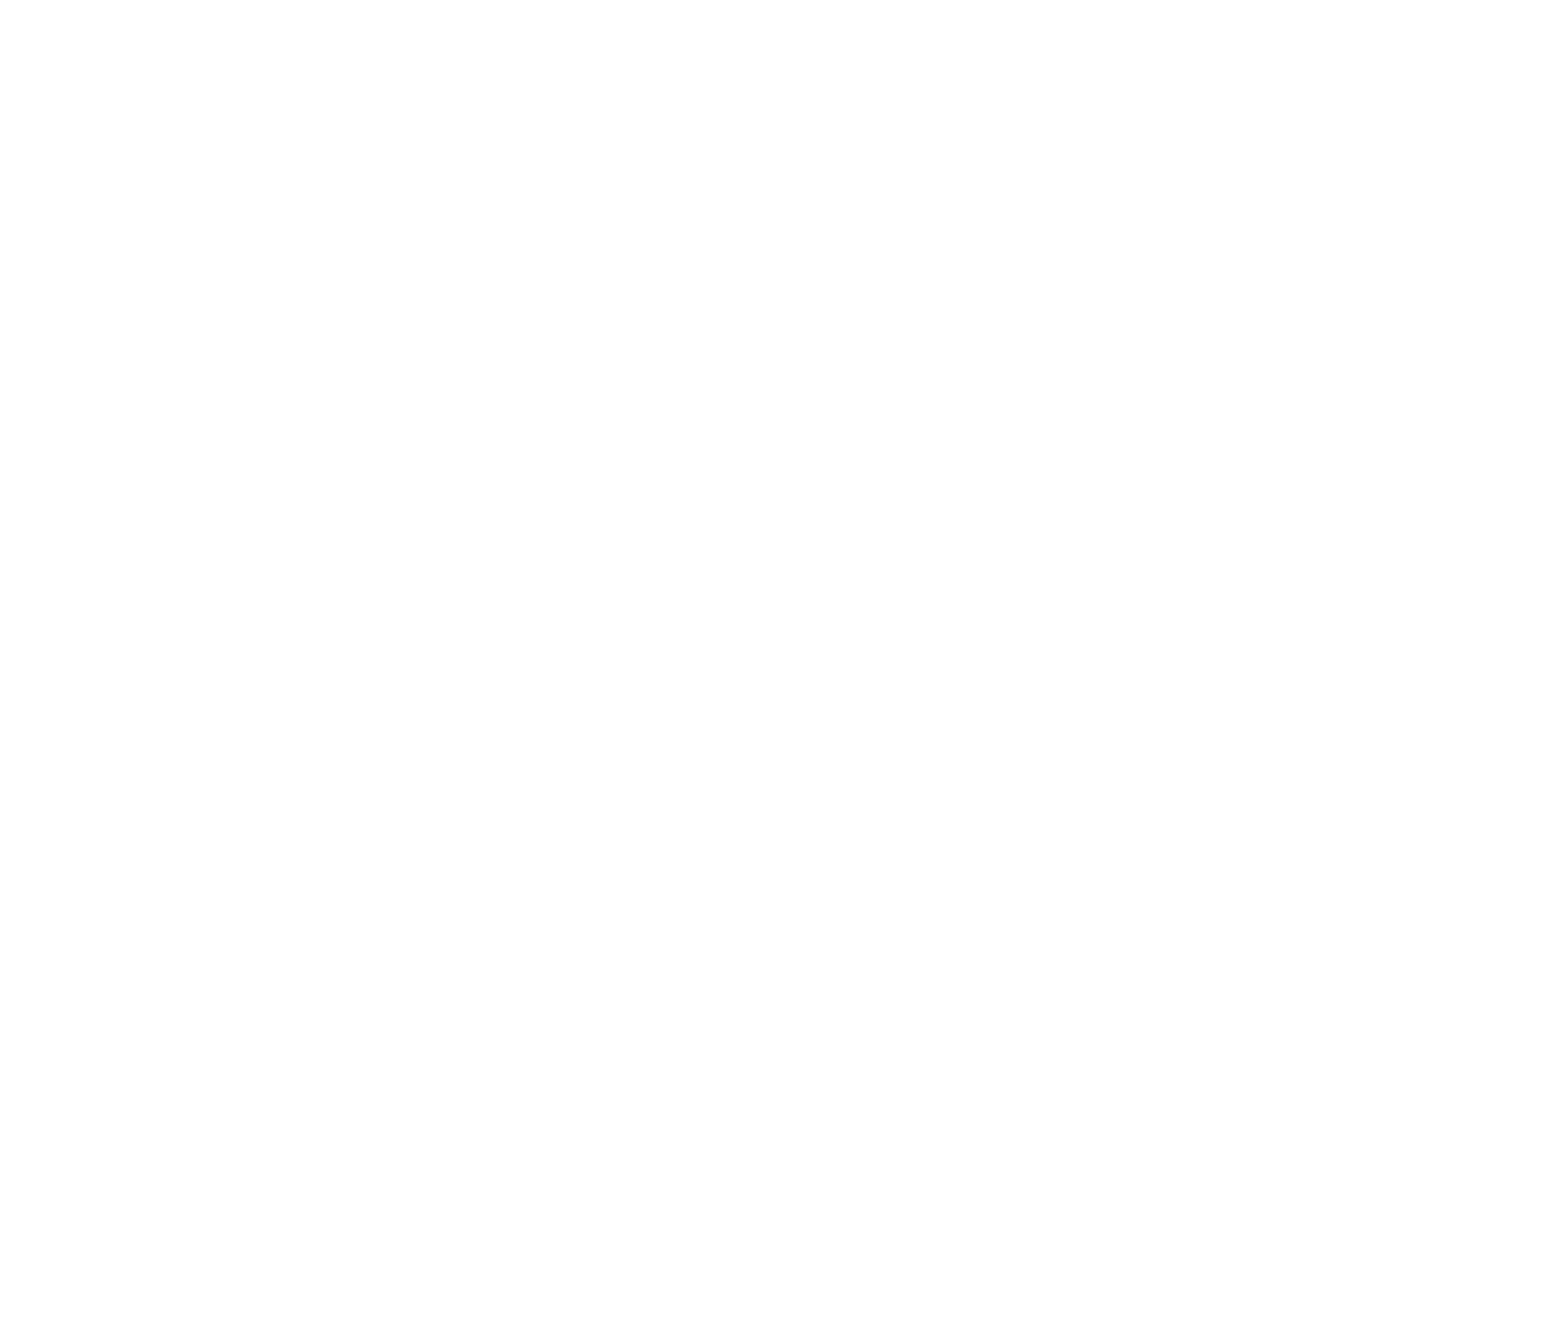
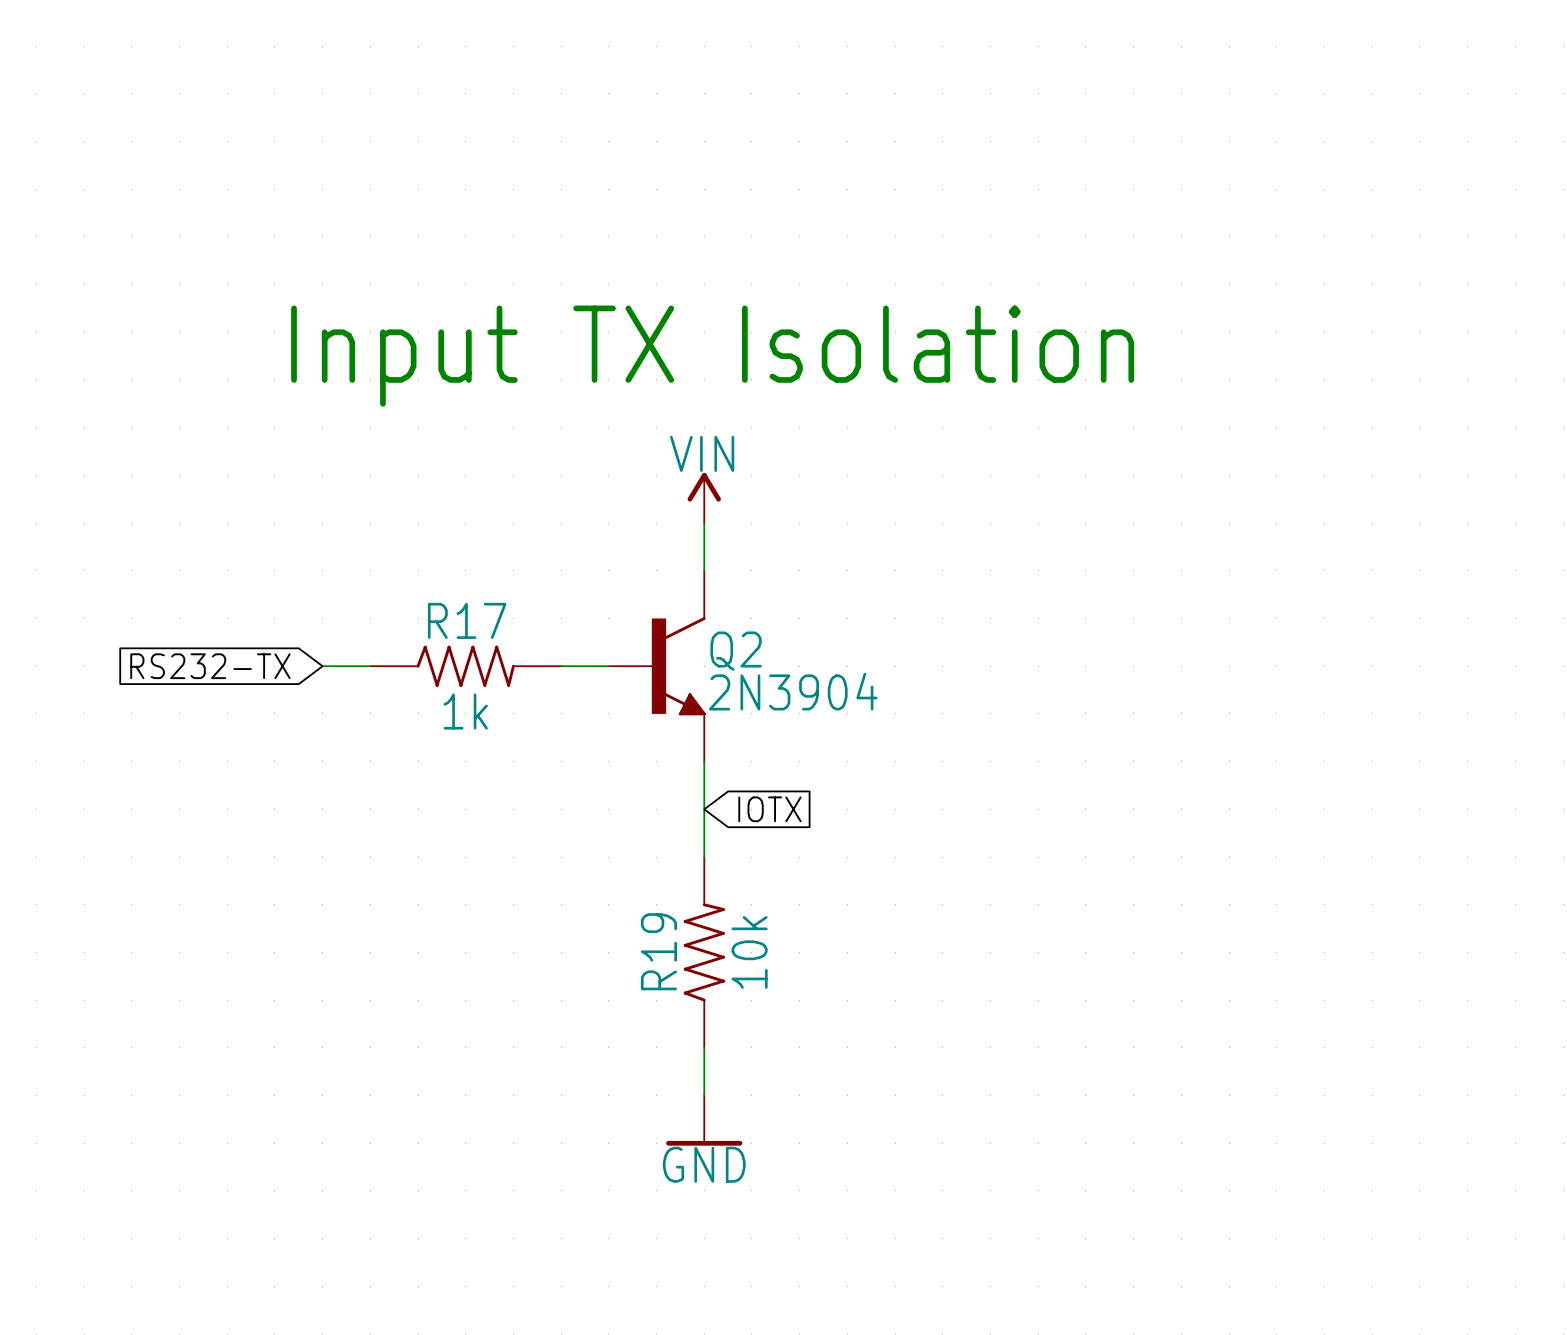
text: none -> Input TX Isolation (712, 356)
power symbol: none -> VIN (704, 498)
wire: none -> (704, 523) (704, 570)
global label: none -> RS232-TX (210, 666)
wire: none -> (322, 666) (370, 666)
R17: none -> 1k (465, 666)
wire: none -> (561, 666) (608, 666)
Q2: none -> 2N3904 (657, 666)
wire: none -> (704, 761) (704, 857)
global label: none -> IOTX (769, 809)
R19: none -> 10k (704, 952)
wire: none -> (704, 1047) (704, 1095)
power symbol: none -> GND (704, 1120)

